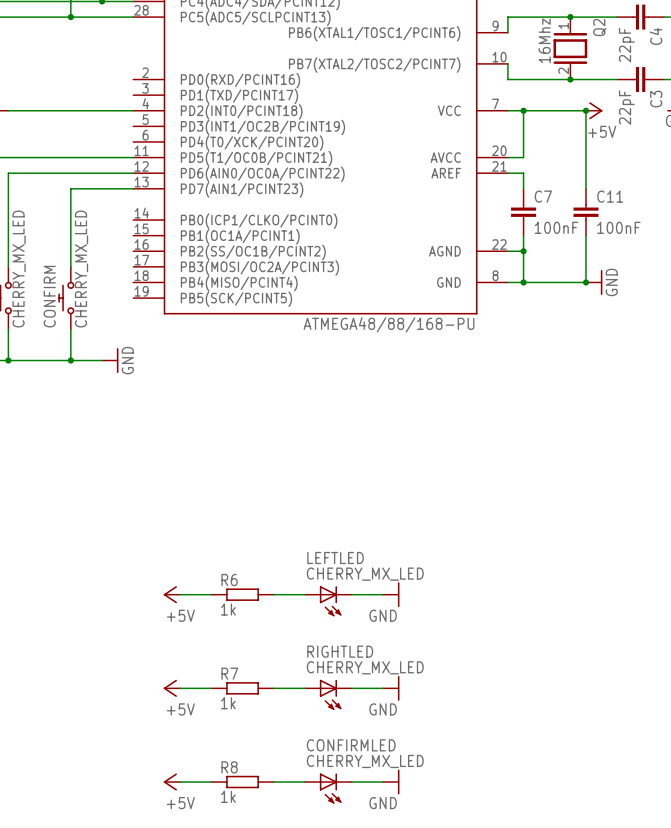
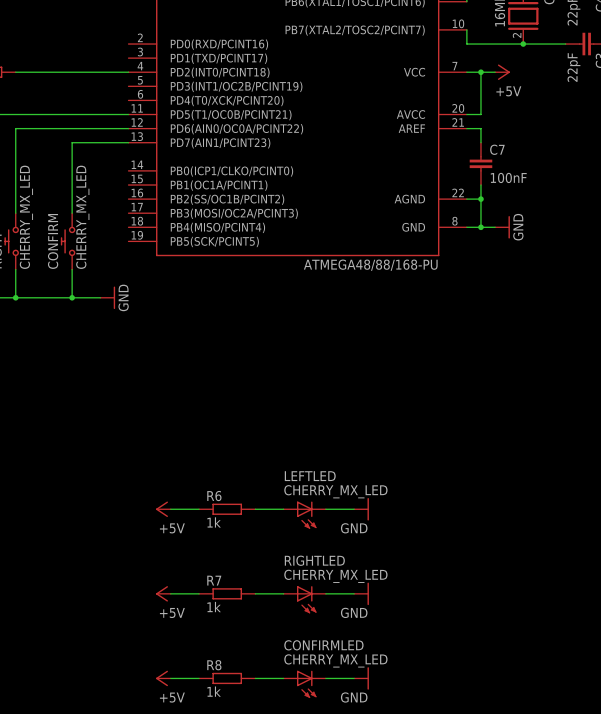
wire: (539, 110) (585, 110) (585, 188) -> none
junction: (585, 110) -> none
power symbol position: +5V (594, 110) -> +5V (502, 72)
C11: 100nF (585, 212) -> none
wire: (585, 235) (585, 282) (539, 282) -> none
junction: (585, 282) -> none
power symbol position: GND (594, 282) -> GND (502, 227)

